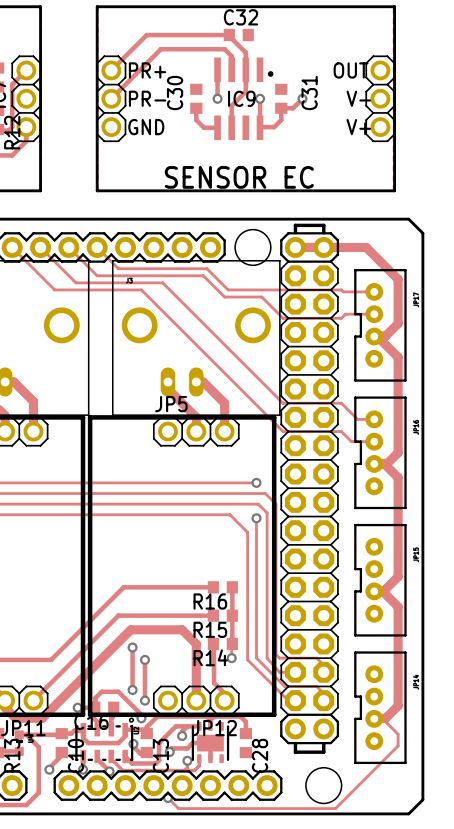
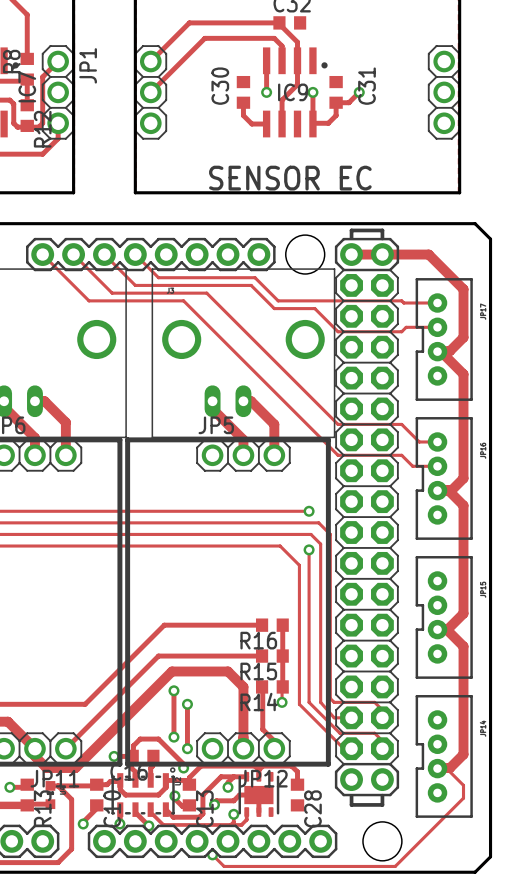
text: PR+ (147, 70) -> none
text: OUT (351, 70) -> none
JP1 name: none -> JP1 (88, 65)
text: PR- (147, 98) -> none
text: V- (358, 98) -> none
text: GND (146, 127) -> none
text: V+ (358, 127) -> none

